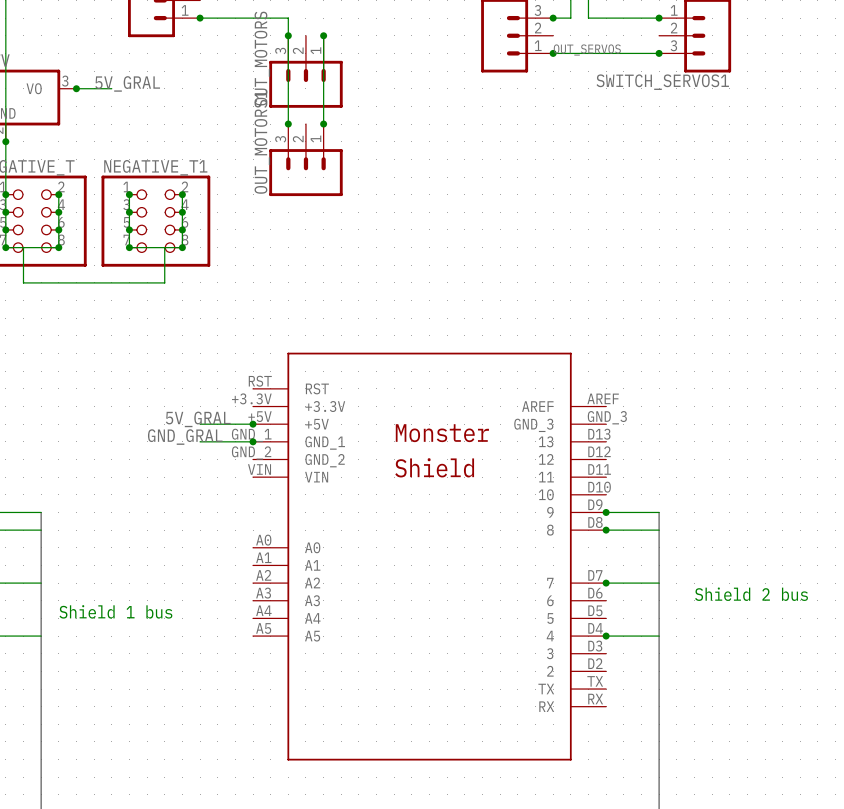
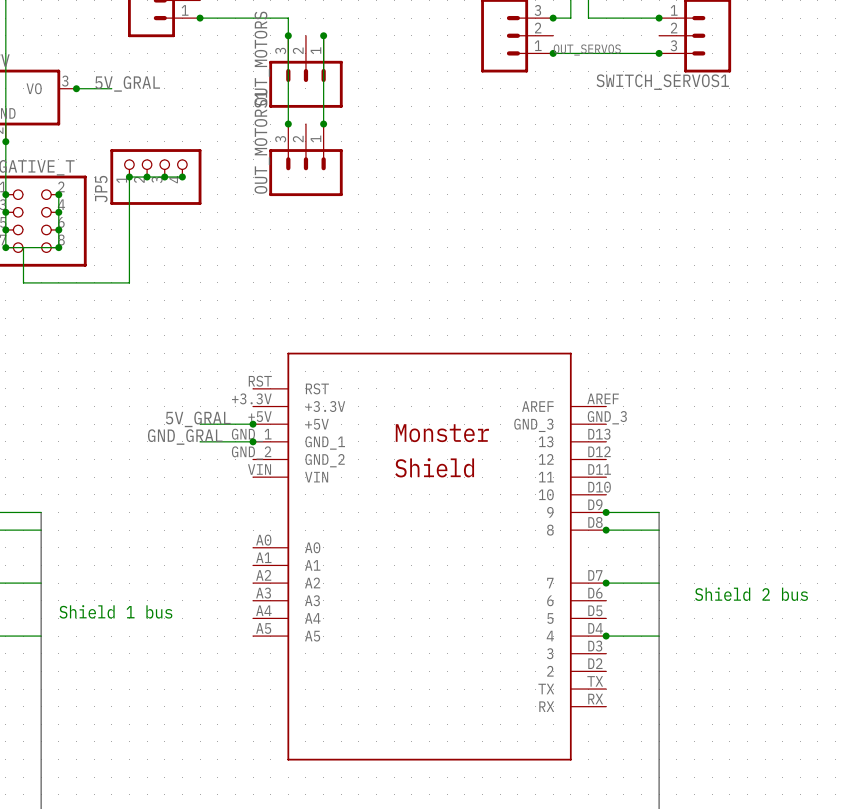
junction: none -> (129, 177)
junction: none -> (147, 177)
JP5: none -> (155, 177)
junction: none -> (164, 177)
junction: none -> (182, 177)
junction: (129, 194) -> none
wire: (182, 194) (182, 247) (129, 247) -> none
junction: (182, 194) -> none
junction: (129, 212) -> none
junction: (182, 212) -> none
NEGATIVE_T1: (155, 221) -> none
junction: (129, 229) -> none
junction: (182, 229) -> none
junction: (129, 247) -> none
wire: (164, 247) (164, 282) (129, 282) -> (129, 247) (129, 282)
junction: (182, 247) -> none

